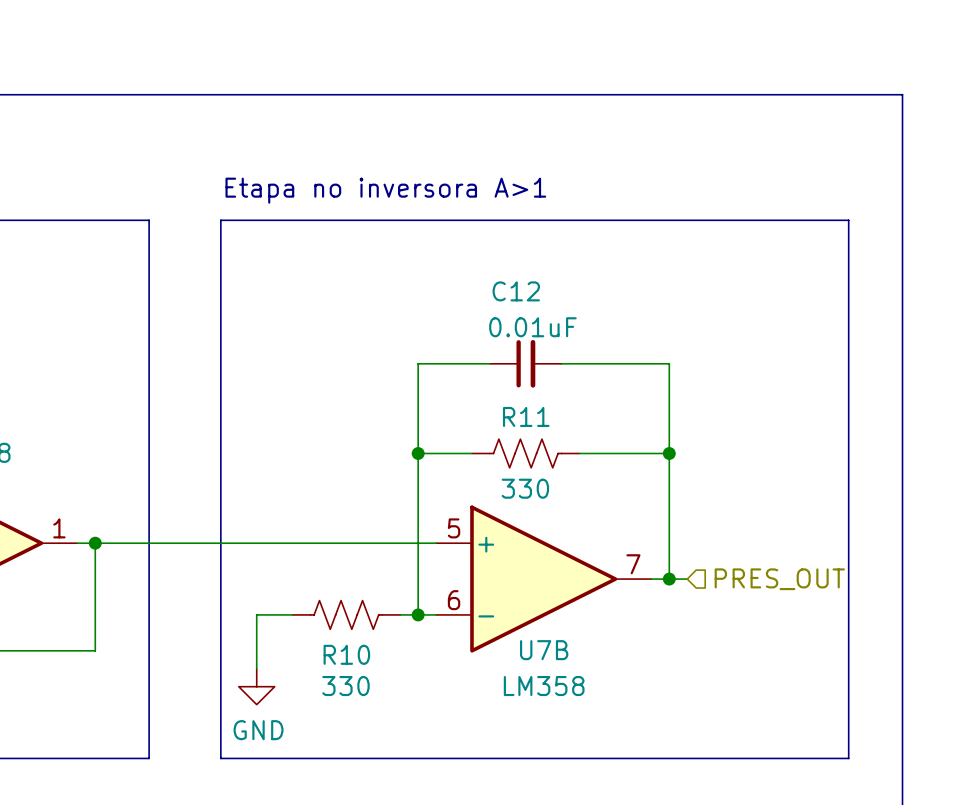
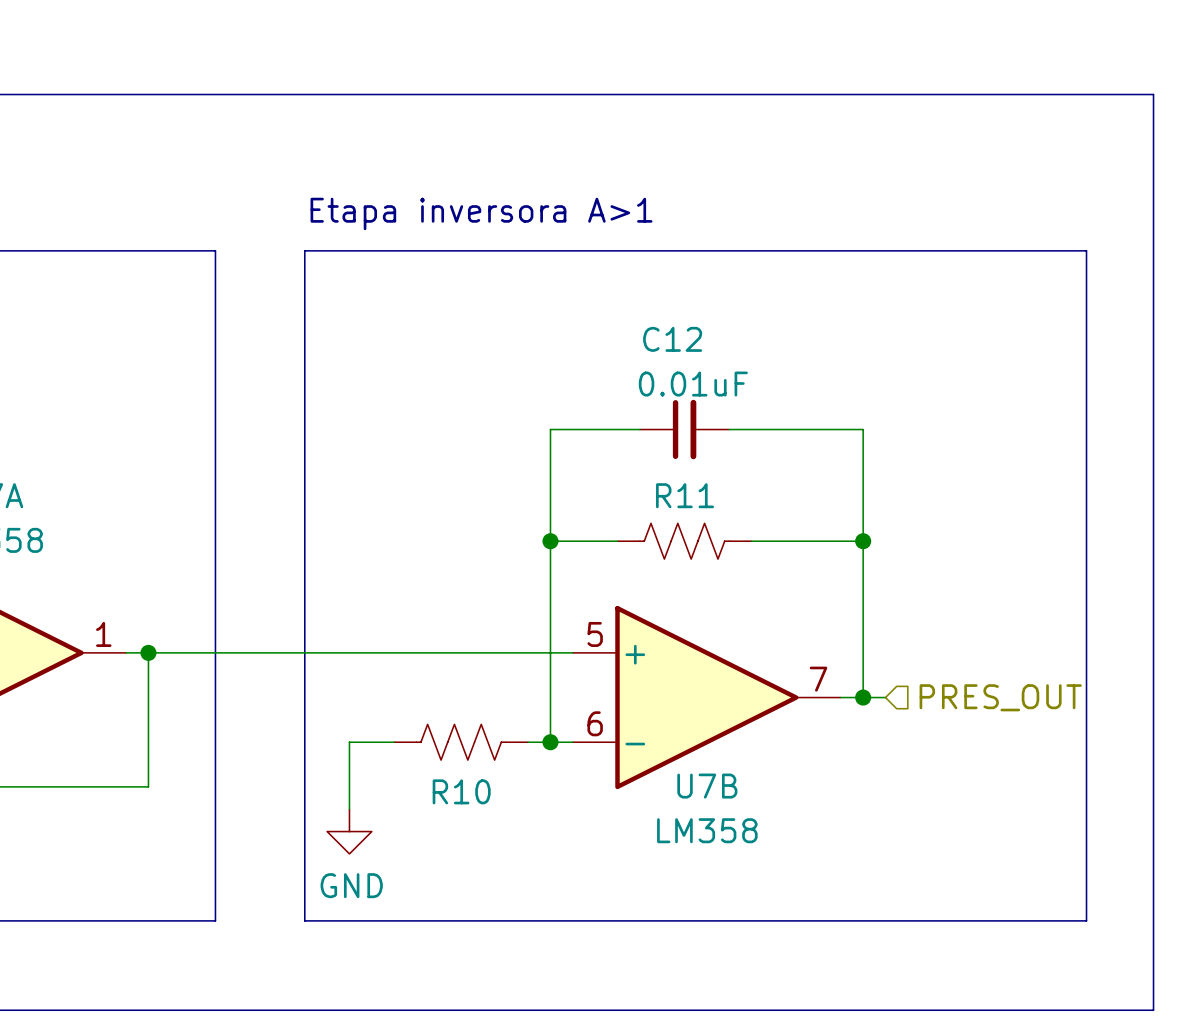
text: Etapa no inversora A>1 (385, 190) -> Etapa inversora A>1 (481, 213)
R11 value: 330 (525, 488) -> none
R10 value: 330 (345, 686) -> none

